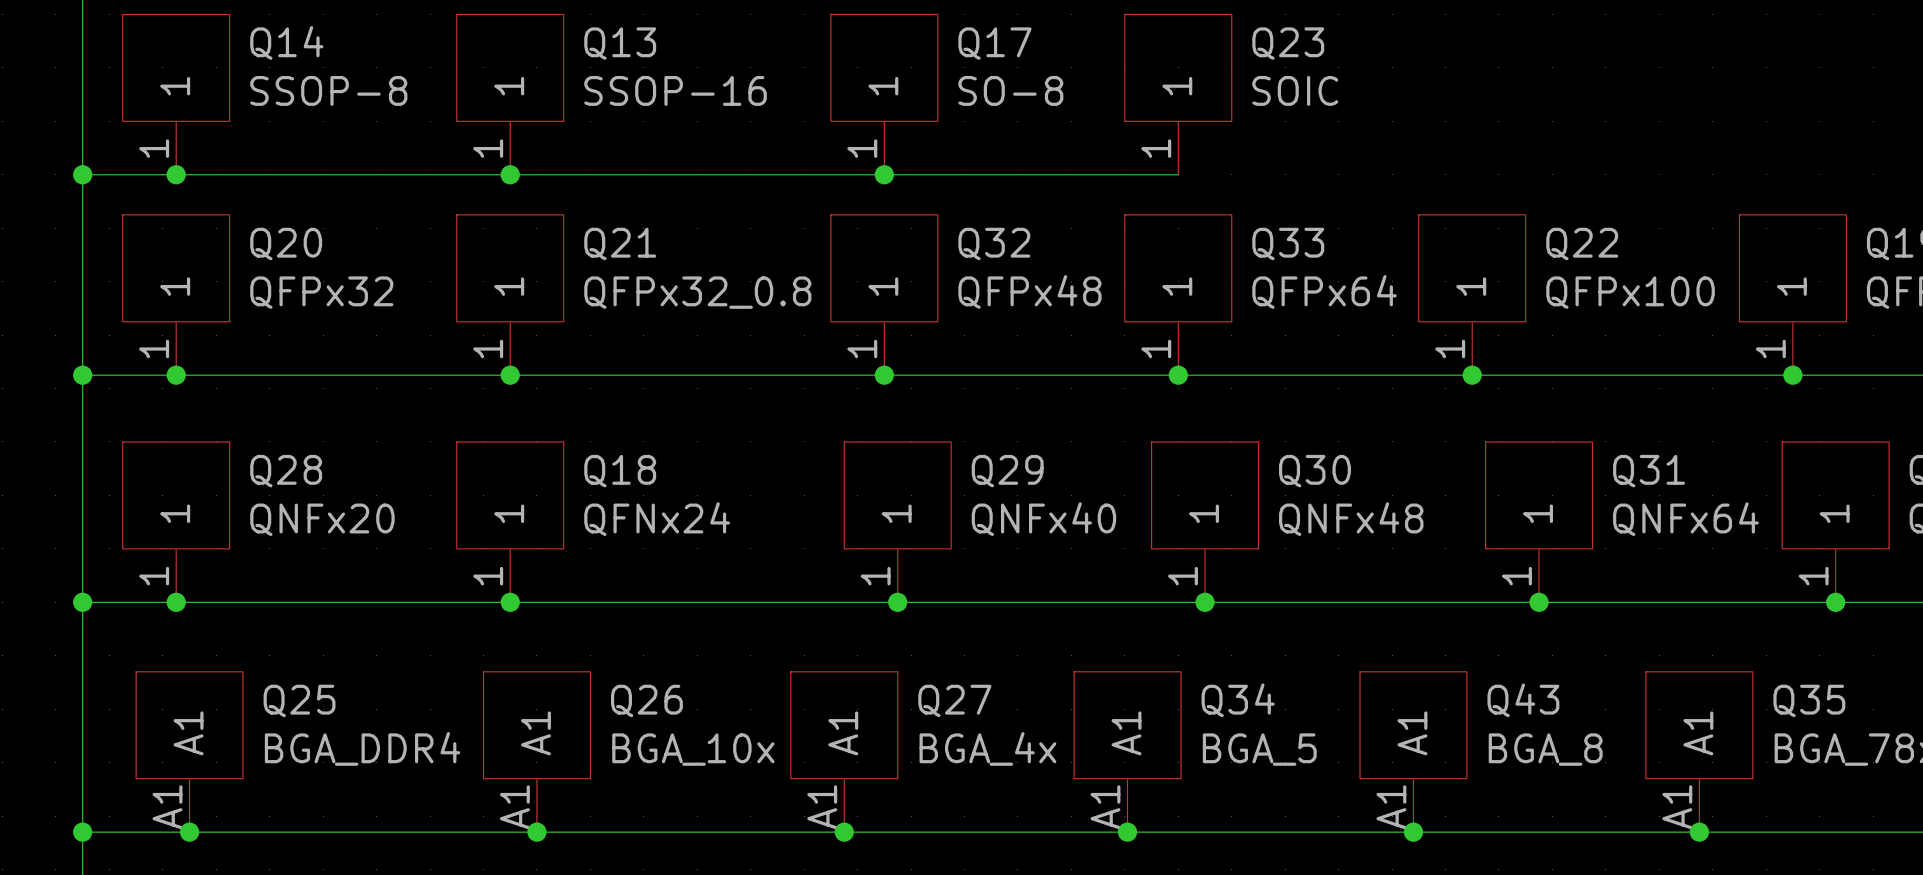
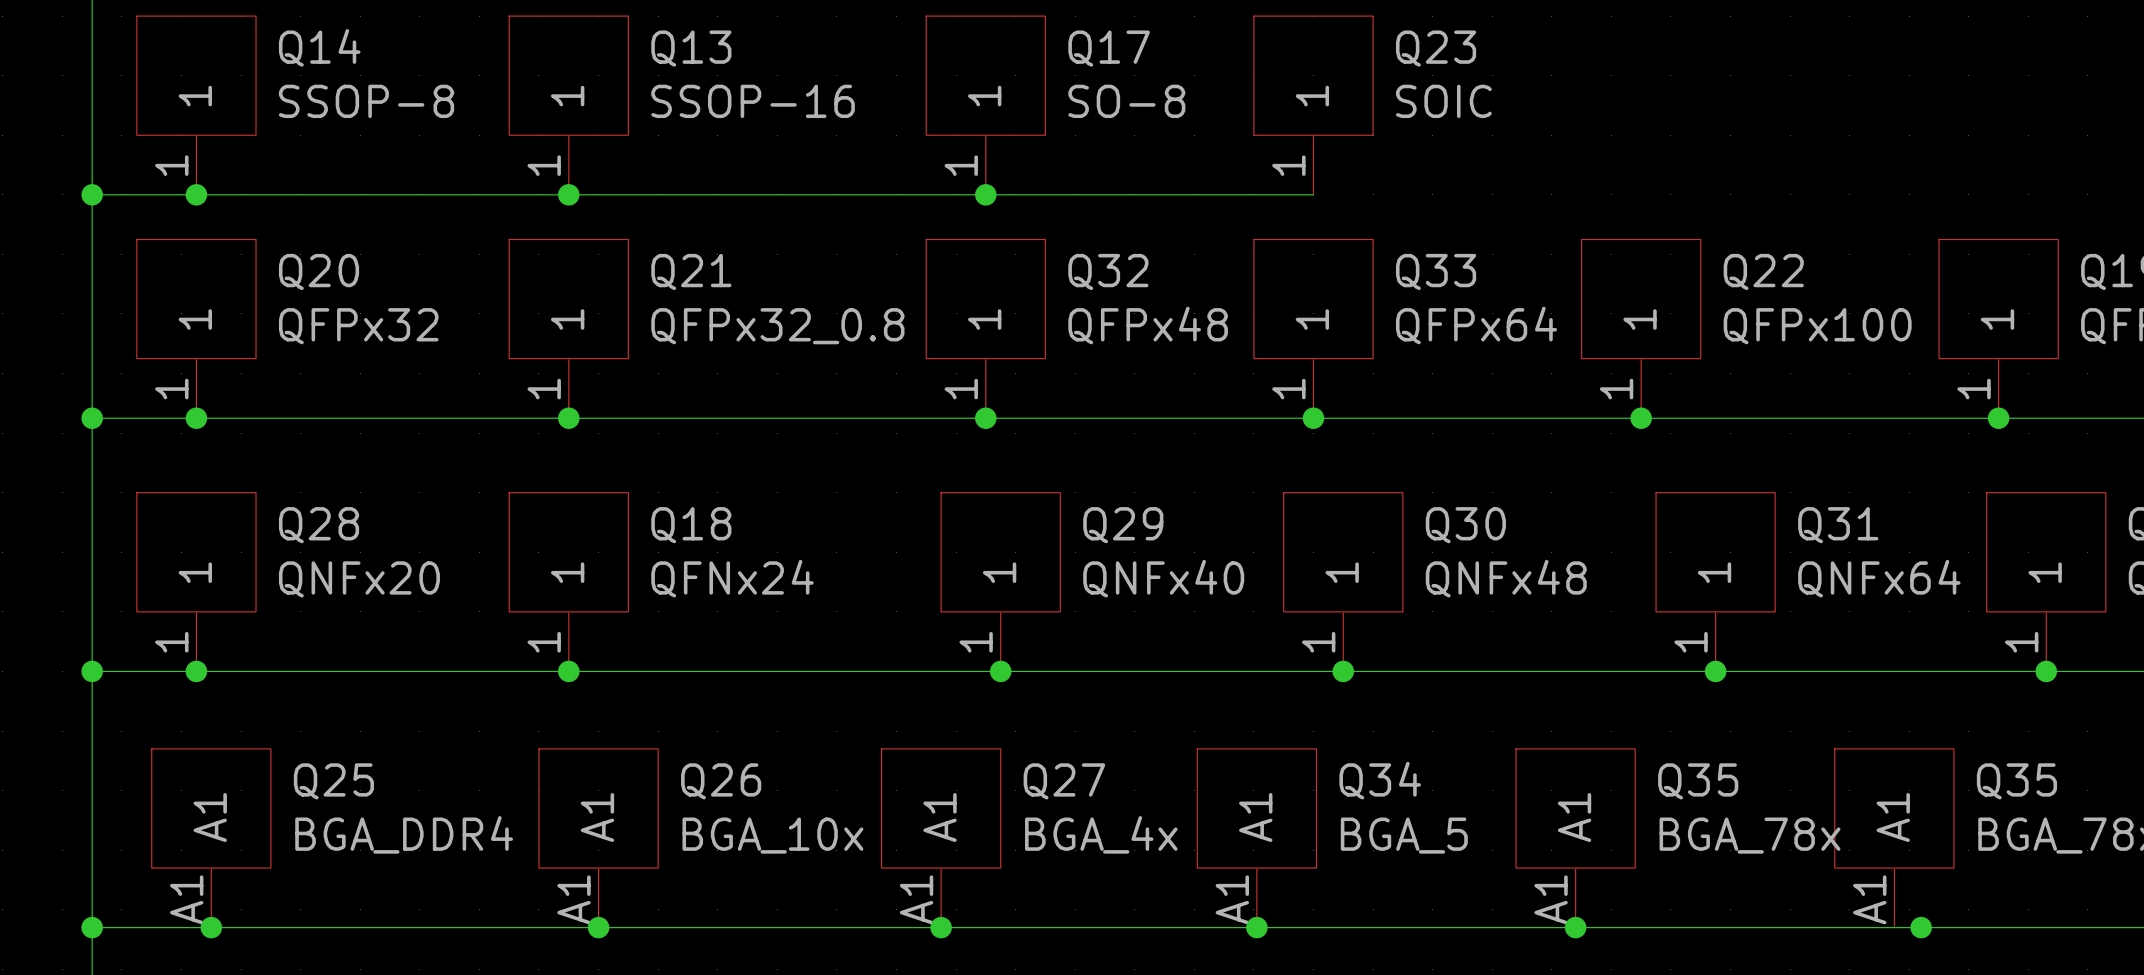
Q43 name: Q43 (1523, 700) -> Q35 (1698, 781)
Q43 value: BGA_8 (1545, 749) -> BGA_78x (1749, 835)
junction position: (1699, 832) -> (1921, 927)

